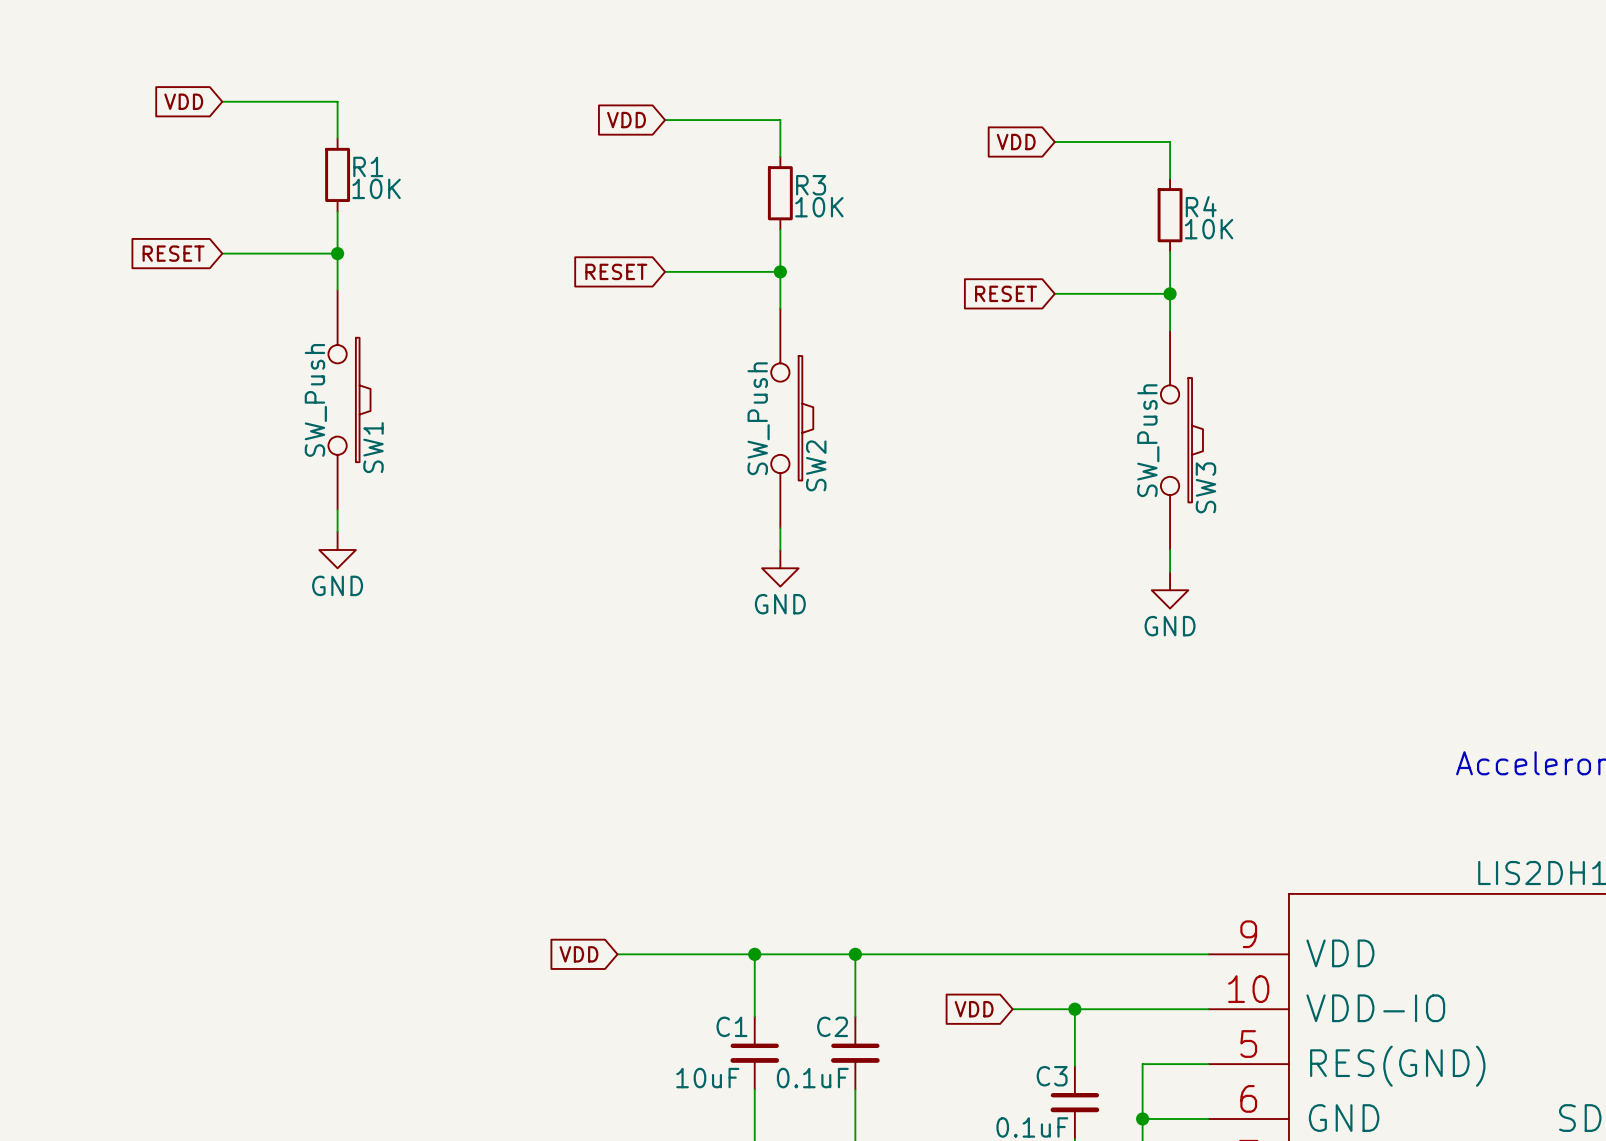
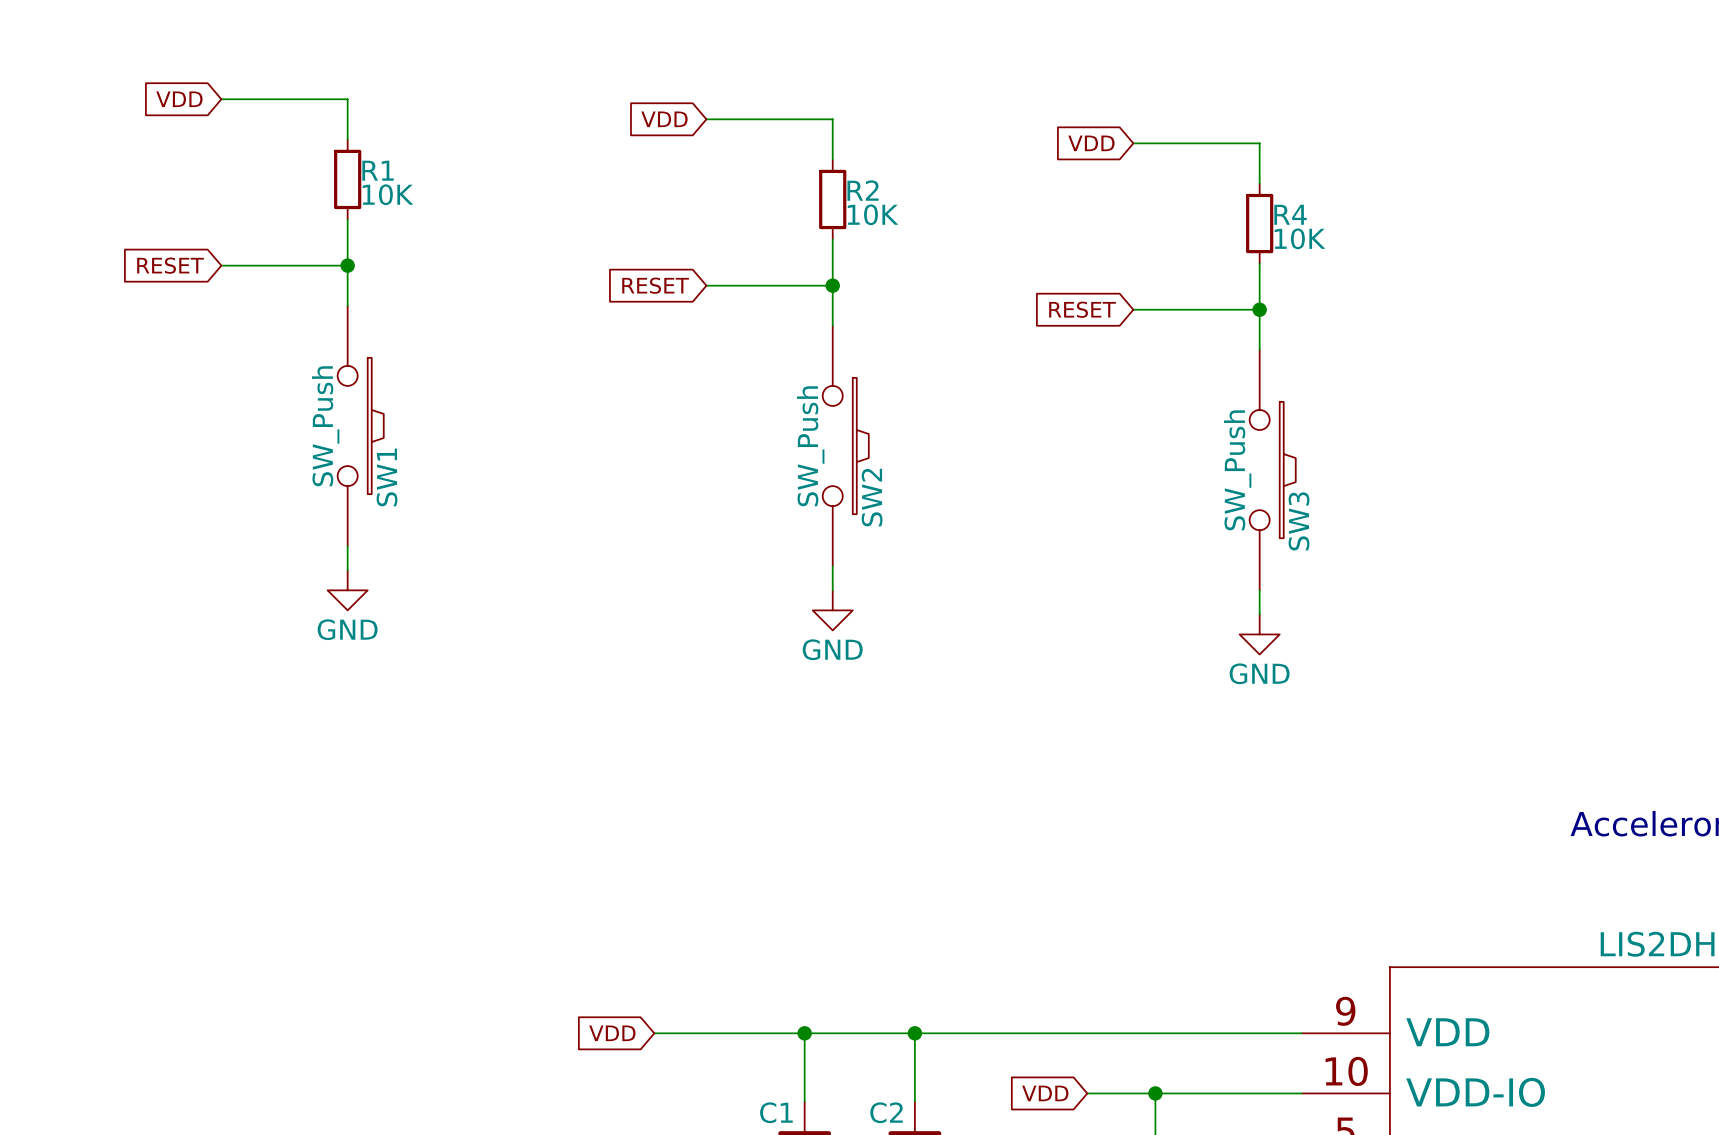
R3 name: R3 (811, 185) -> R2 (863, 190)

